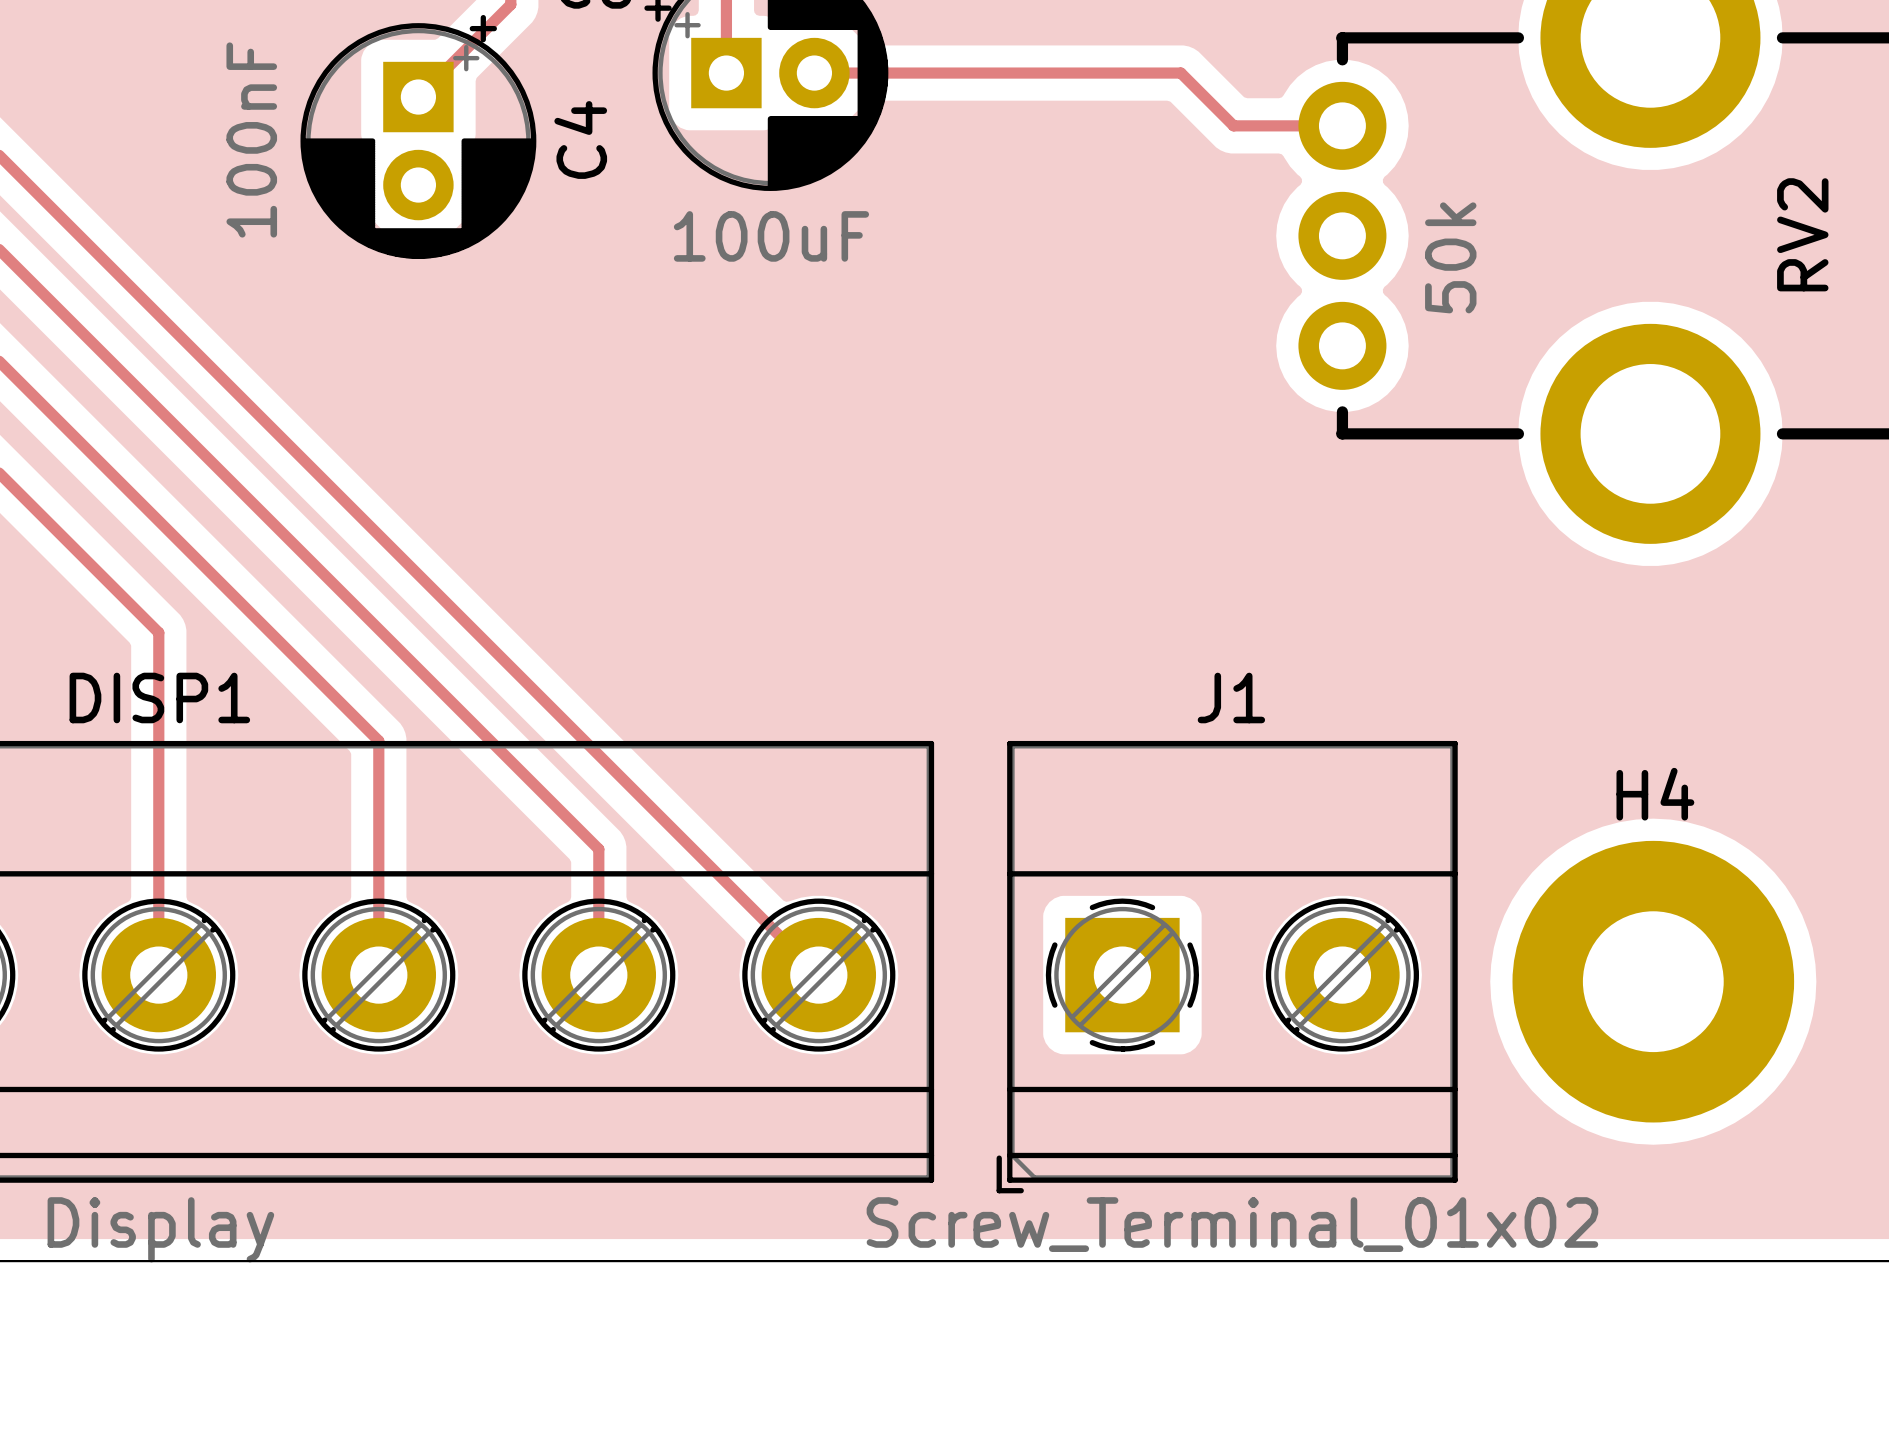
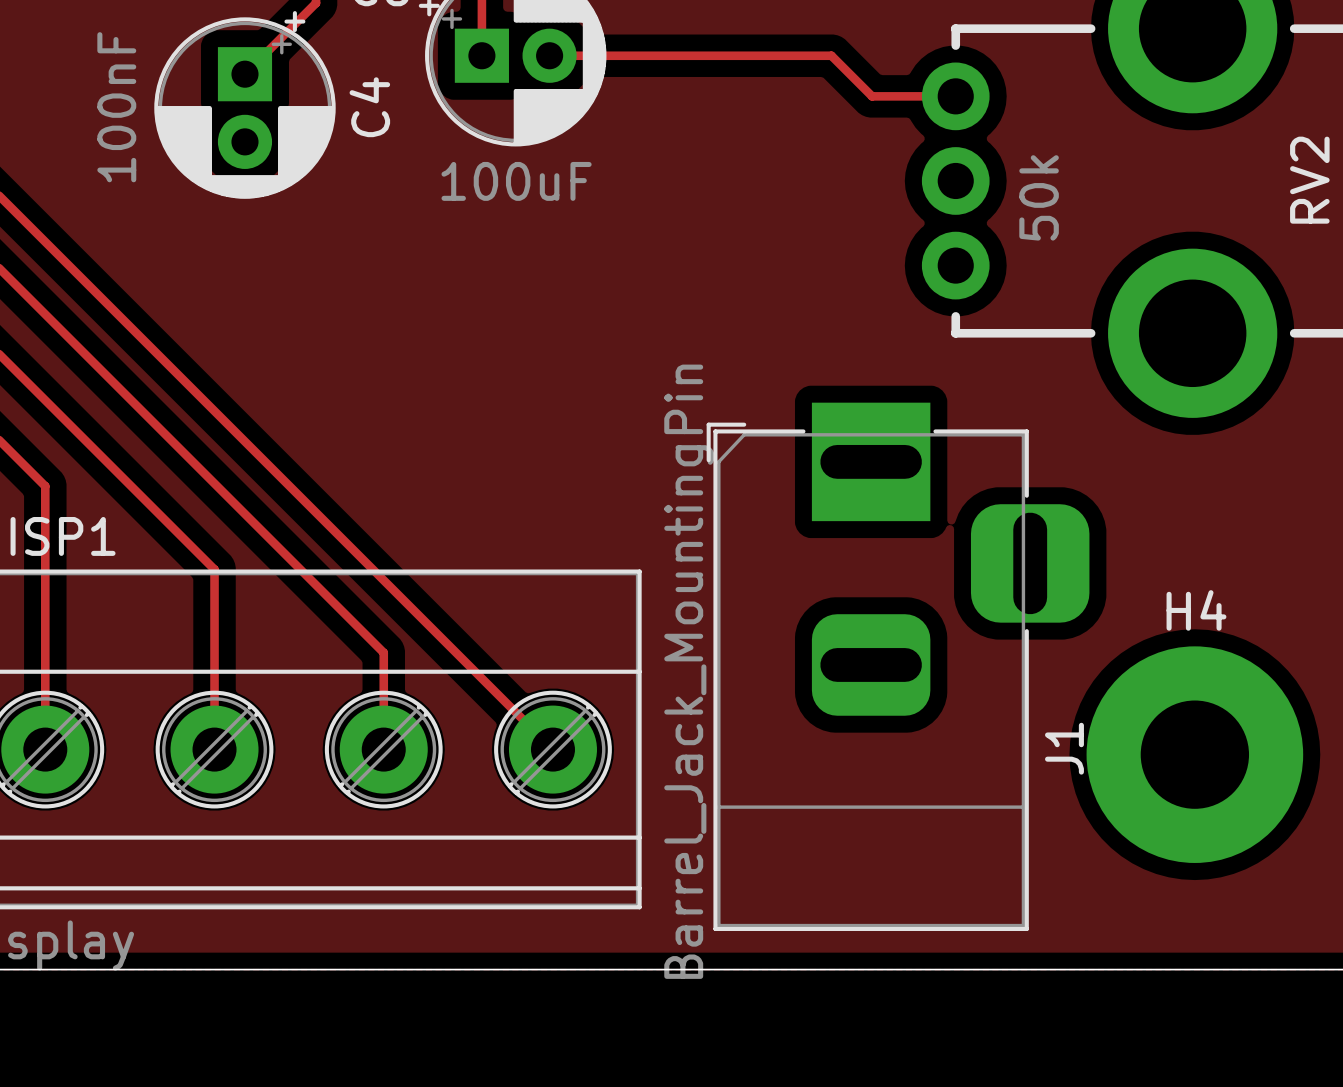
J1 name position: J1 (1231, 697) -> J1 (1064, 748)
J1 footprint: [996, 740, 1458, 1194] -> [706, 402, 1090, 931]
J1 value: Screw_Terminal_01x02 (1232, 1224) -> Barrel_Jack_MountingPin (689, 671)

